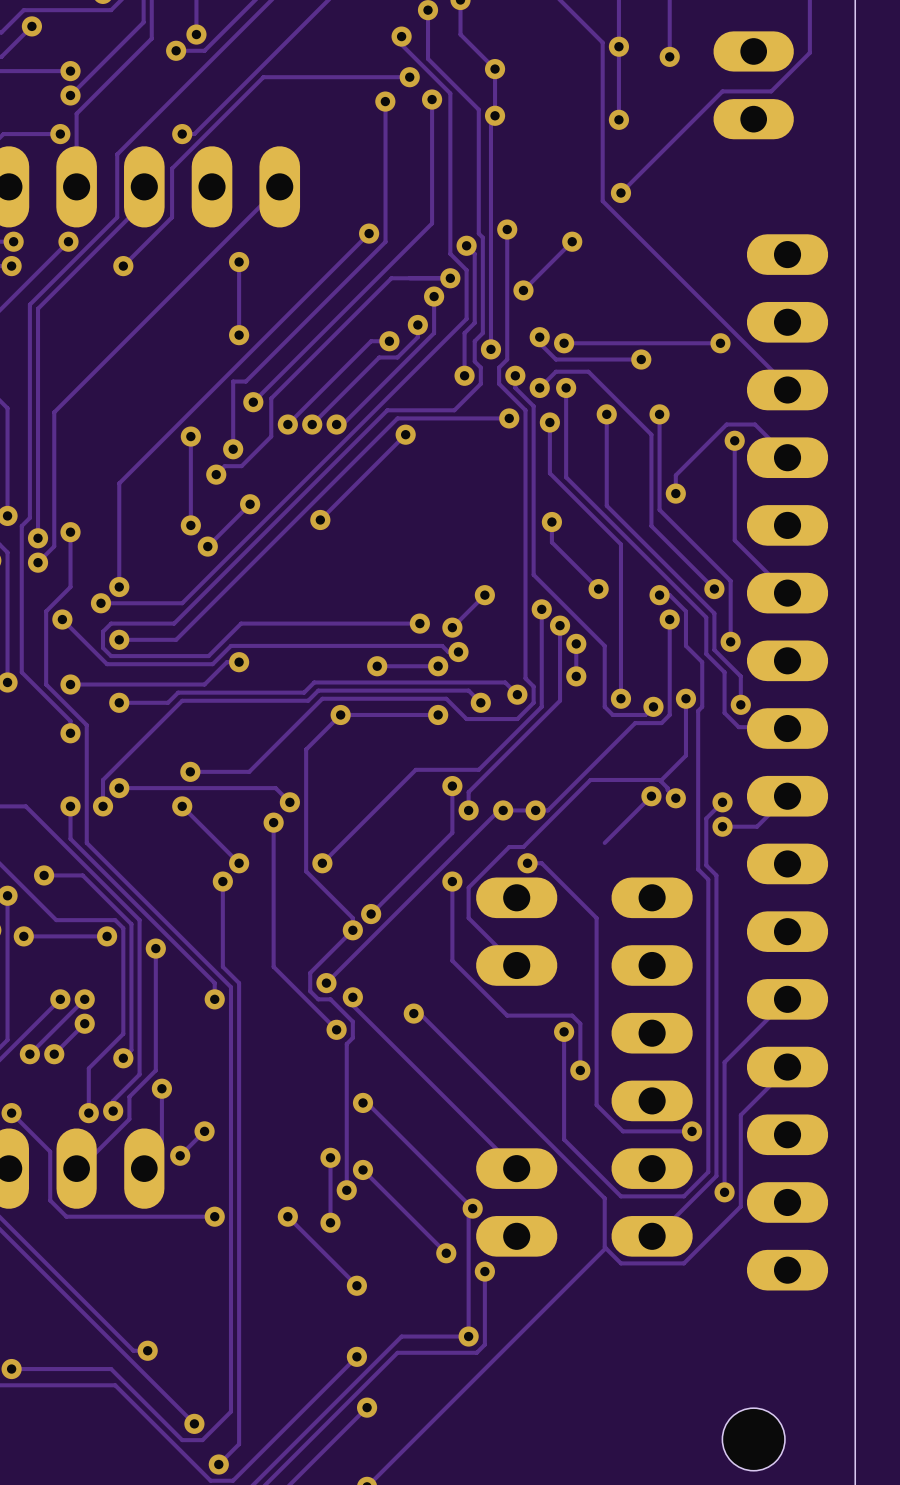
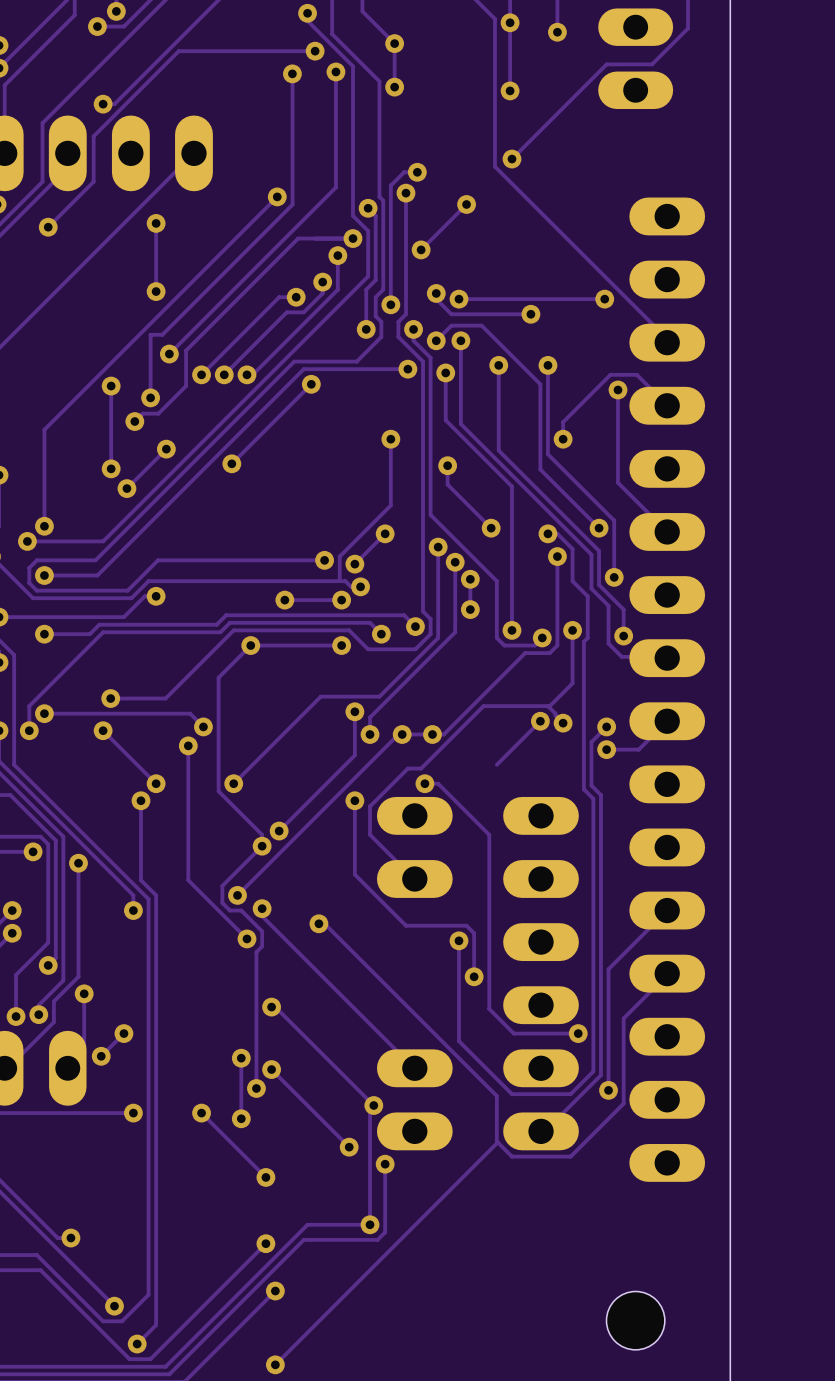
track: (495, 115) (490, 119) (490, 221) -> (417, 172) (404, 172) (390, 185)
via: none -> (417, 172)
track: none -> (390, 439) (390, 505) (339, 556) (339, 581)
via: none -> (390, 439)

